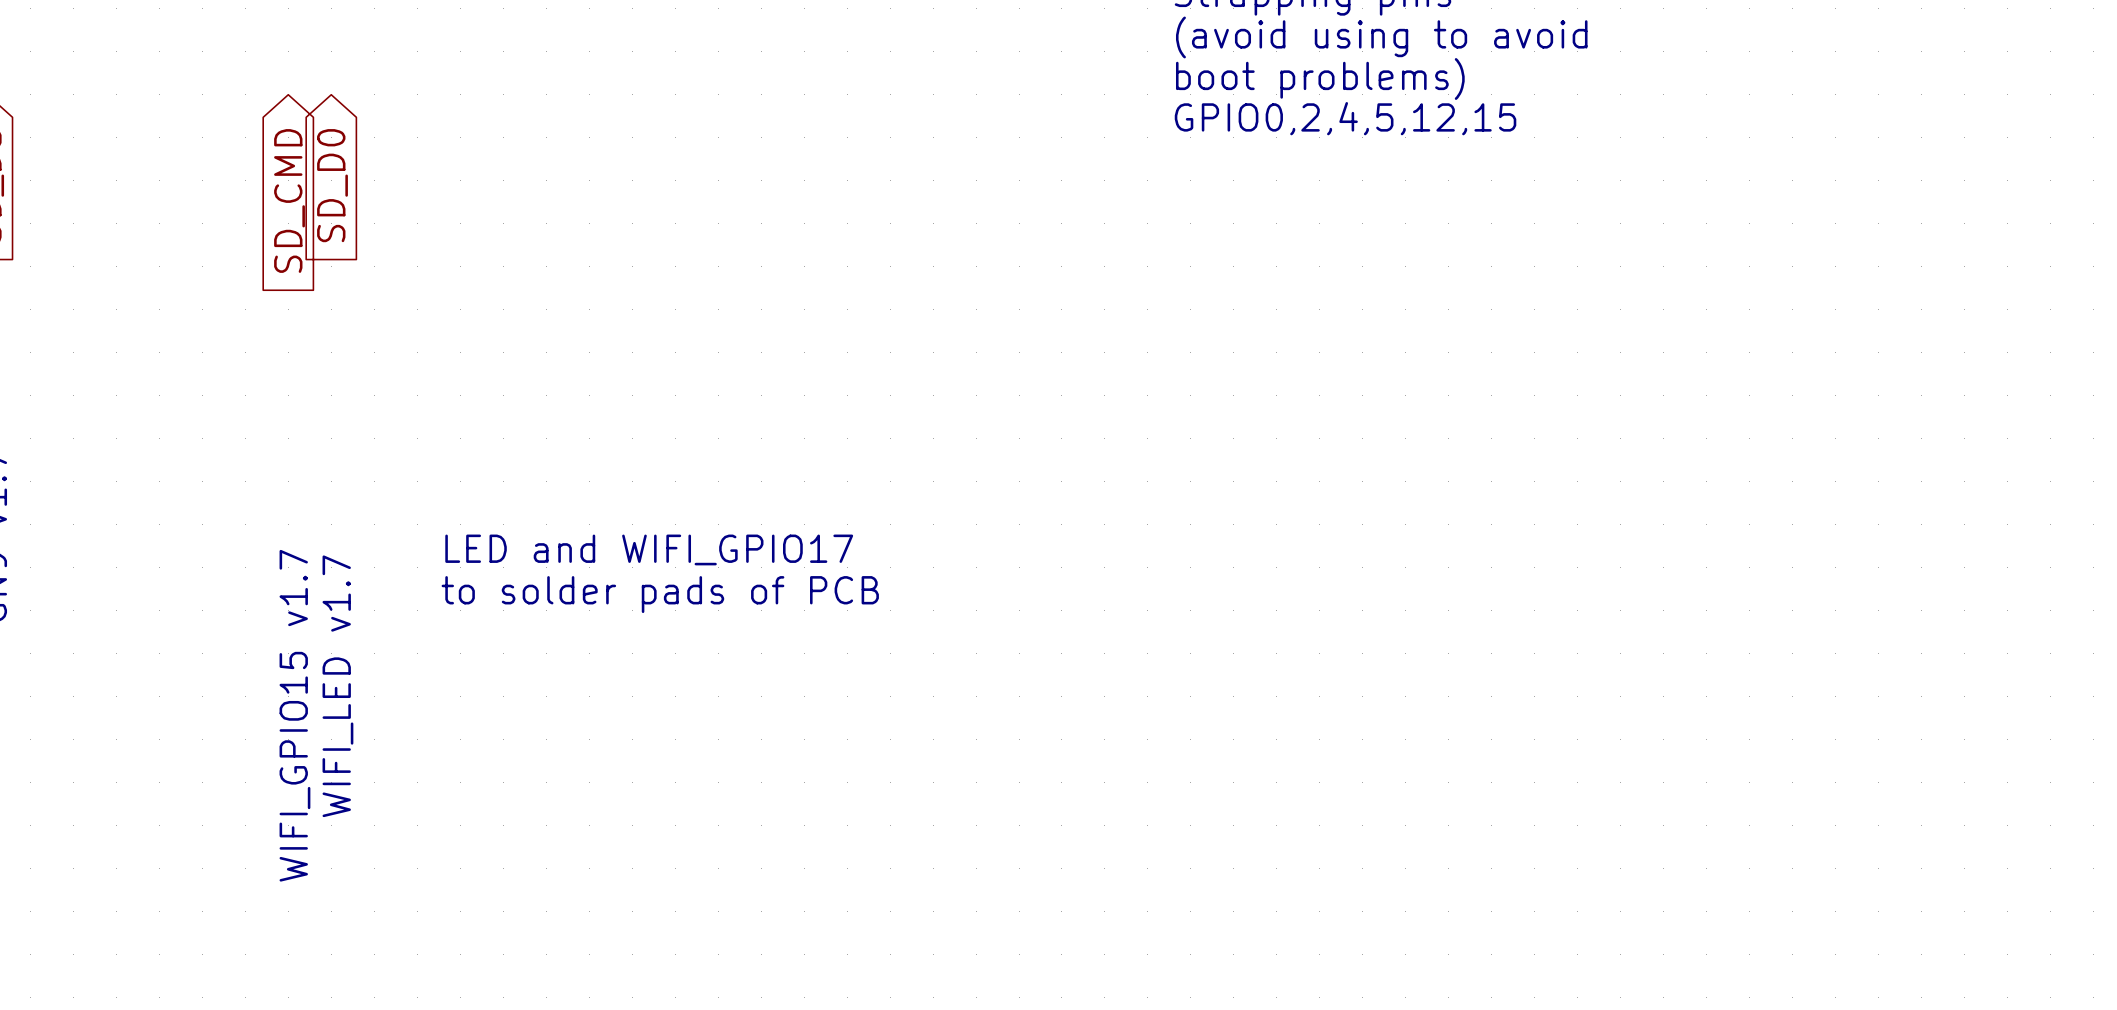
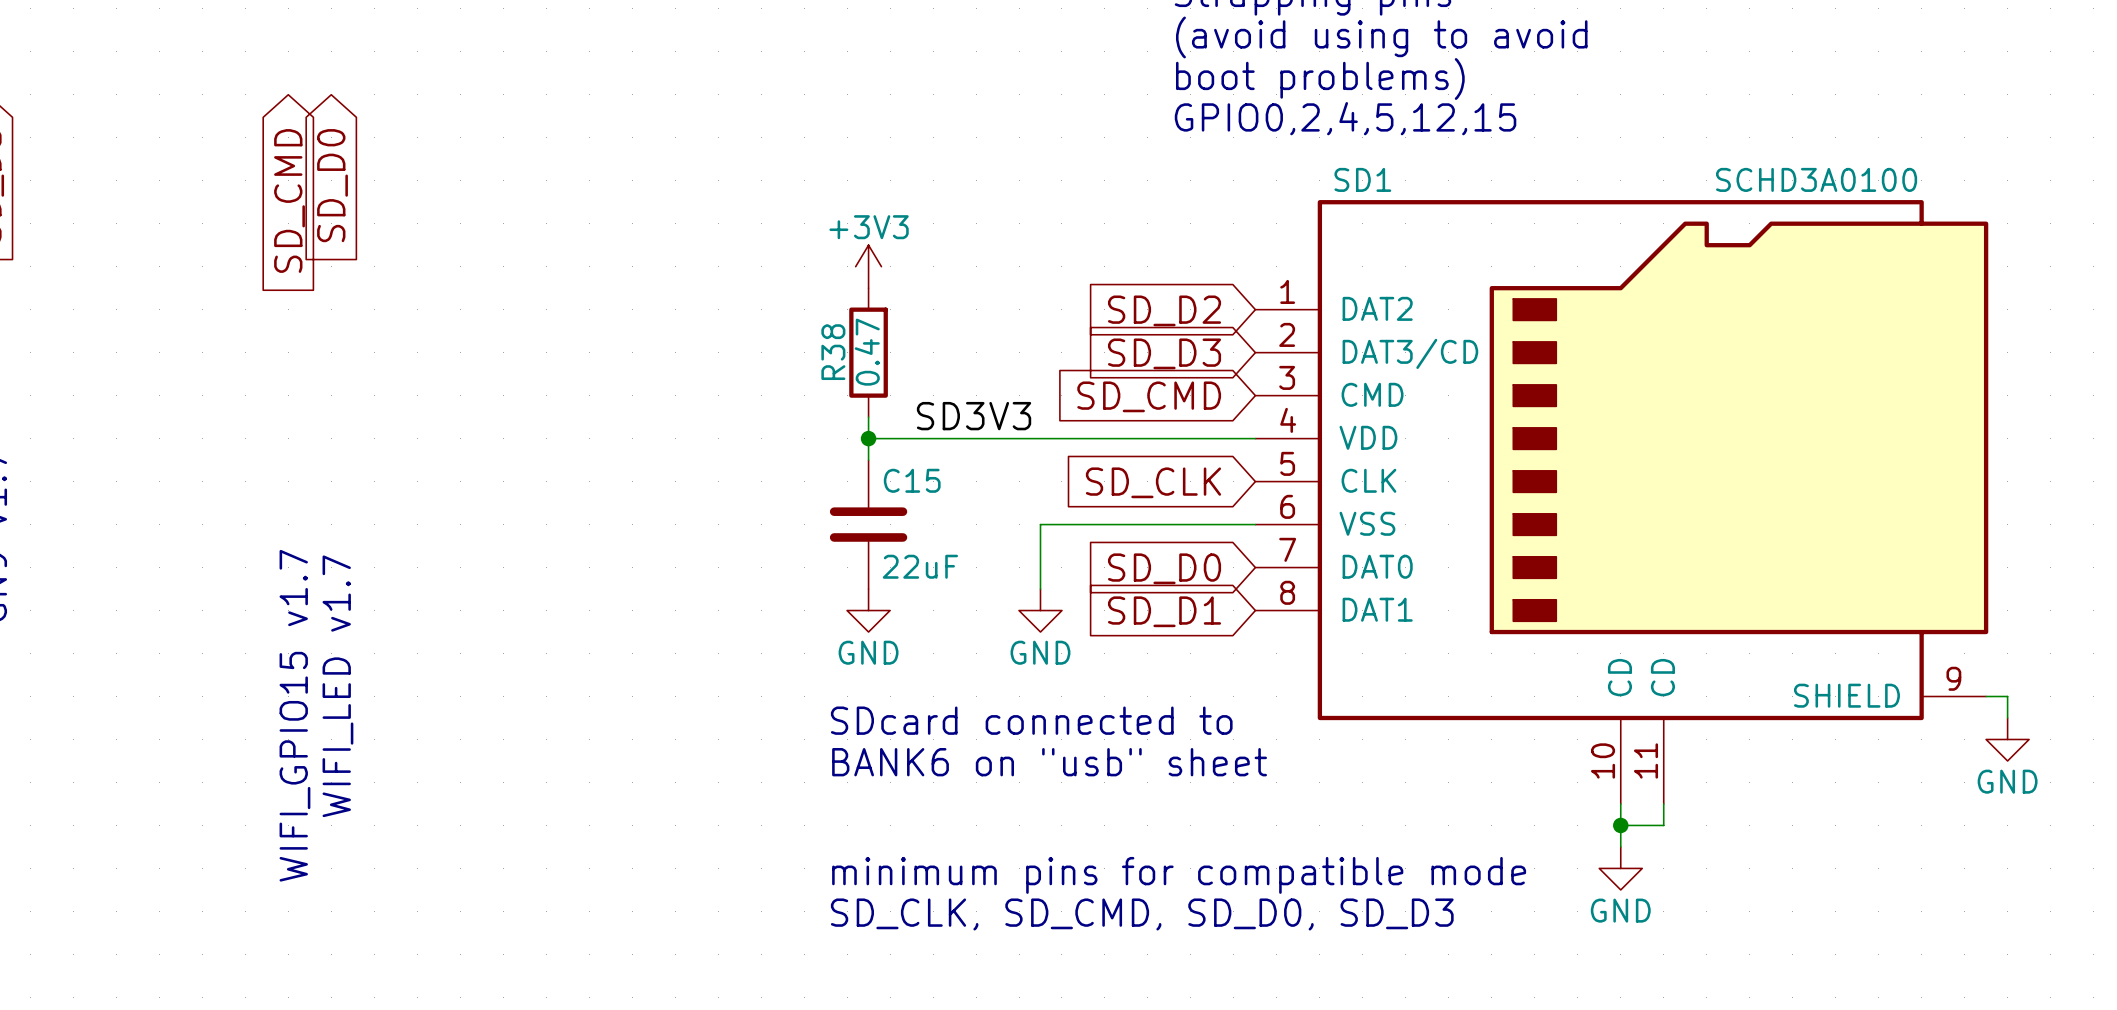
power symbol: none -> +3V3 (868, 266)
global label: none -> SD_D2 (1164, 310)
R38: none -> 0.47 (868, 352)
global label: none -> SD_D3 (1164, 353)
global label: none -> SD_CMD (1149, 396)
label: none -> SD3V3 (974, 416)
wire: none -> (868, 417) (868, 460)
wire: none -> (868, 438) (1255, 438)
junction: none -> (868, 438)
global label: none -> SD_CLK (1153, 482)
SD1: none -> SCHD3A0100 (1621, 502)
C15: none -> 22uF (868, 524)
wire: none -> (1255, 524) (1040, 524) (1040, 589)
text: LED and WIFI_GPIO17 (649, 549) -> none
global label: none -> SD_D0 (1164, 568)
text: to solder pads of PCB (660, 594) -> none
power symbol: none -> GND (868, 610)
power symbol: none -> GND (1040, 610)
global label: none -> SD_D1 (1164, 611)
wire: none -> (1986, 696) (2007, 696) (2007, 717)
text: none -> SDcard connected to (1031, 720)
power symbol: none -> GND (2007, 739)
text: none -> BANK6 on "usb" sheet (1049, 762)
wire: none -> (1620, 803) (1620, 846)
wire: none -> (1663, 803) (1663, 825) (1620, 825)
junction: none -> (1620, 825)
power symbol: none -> GND (1620, 868)
text: none -> minimum pins for compatible mode (1179, 875)
text: none -> SD_CLK, SD_CMD, SD_D0, SD_D3 (1142, 914)

